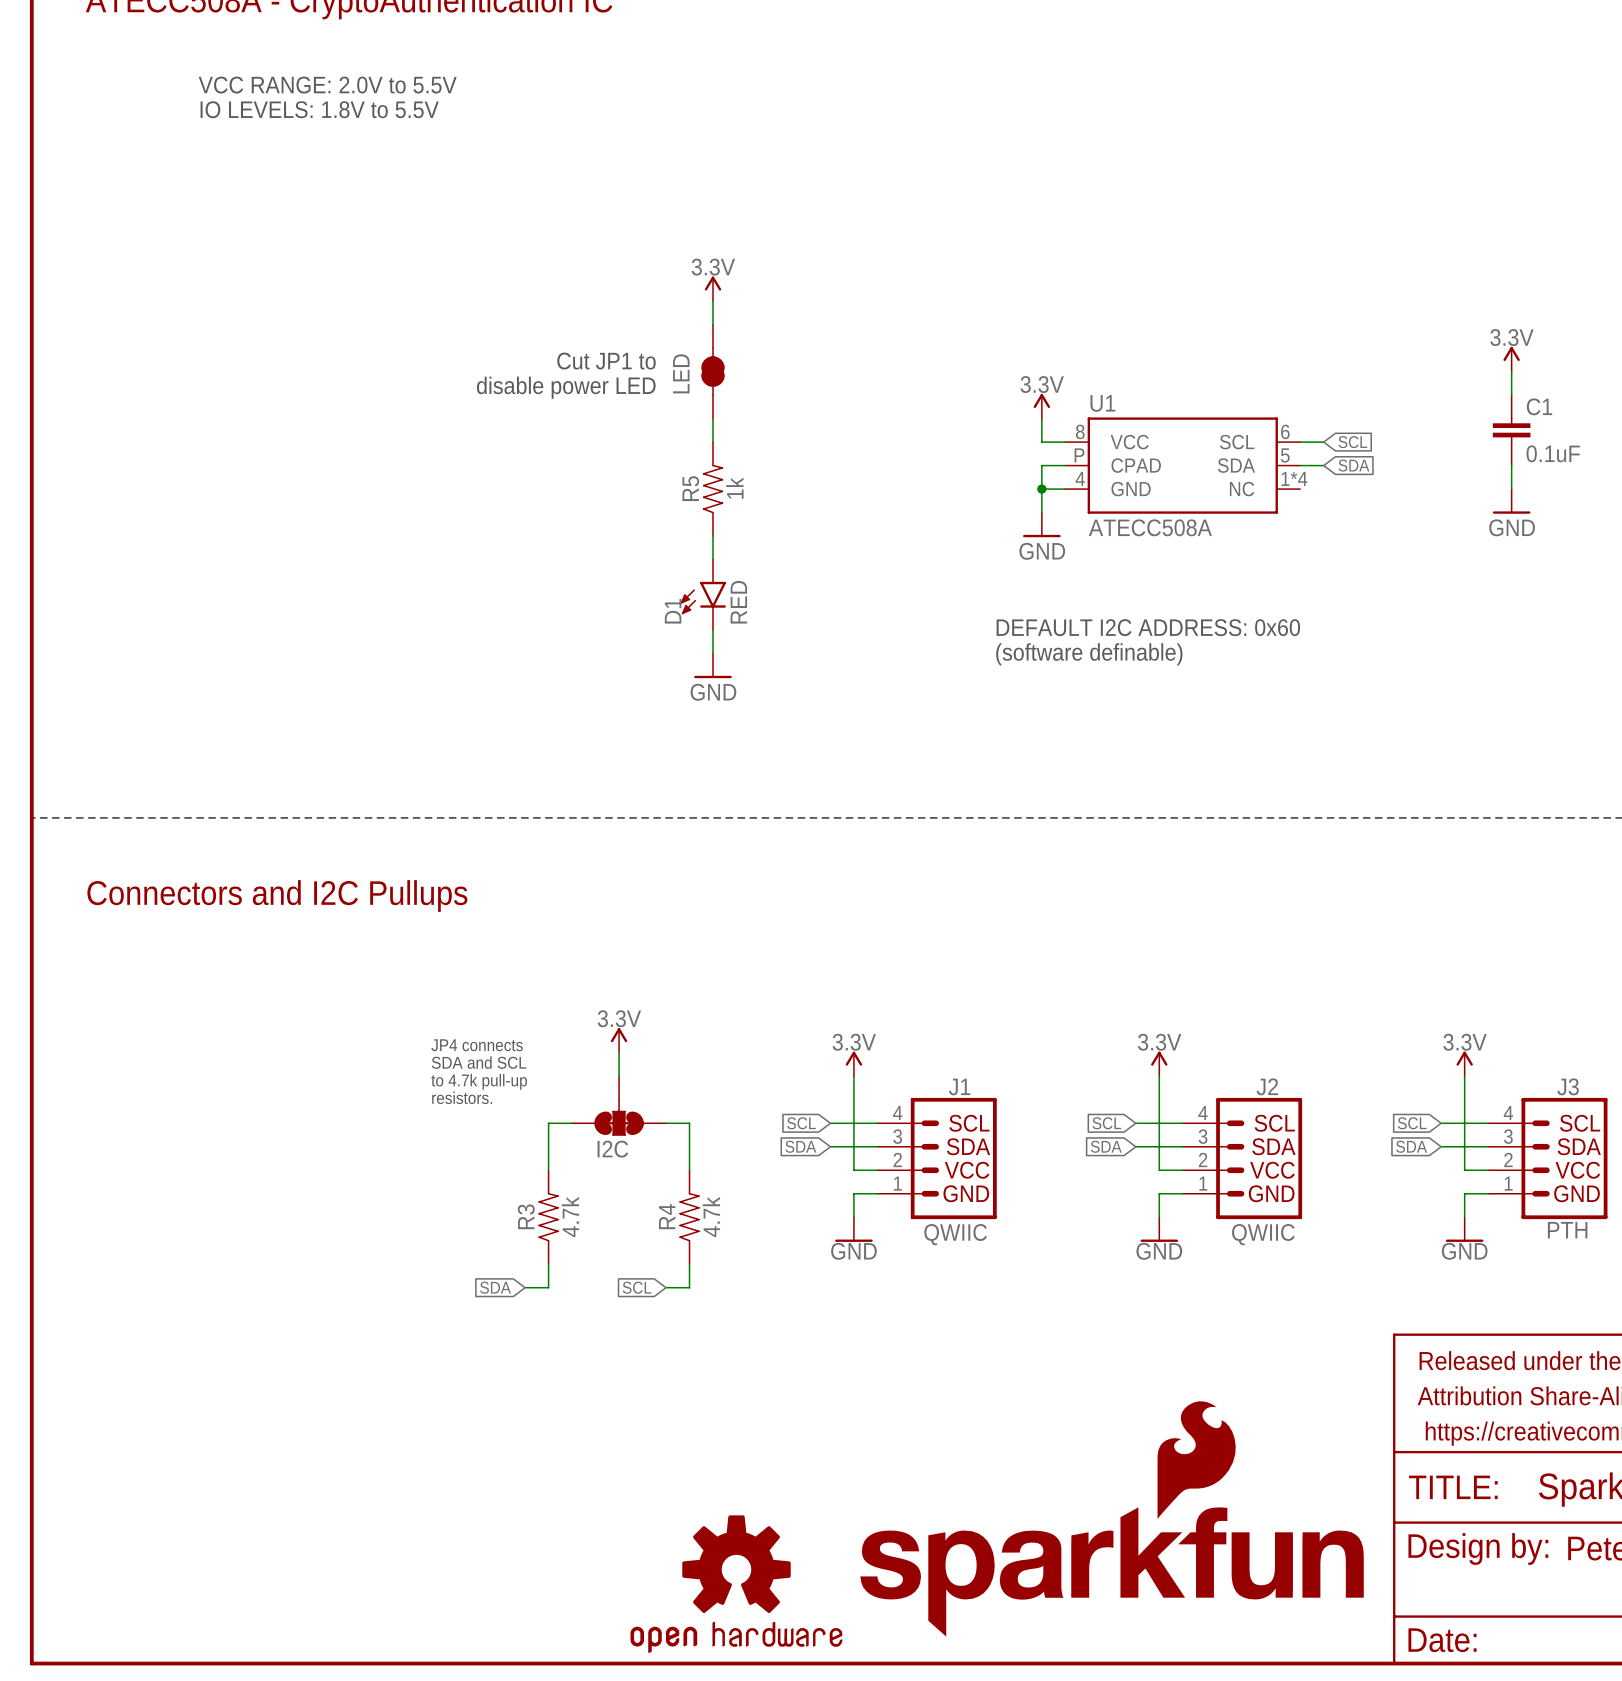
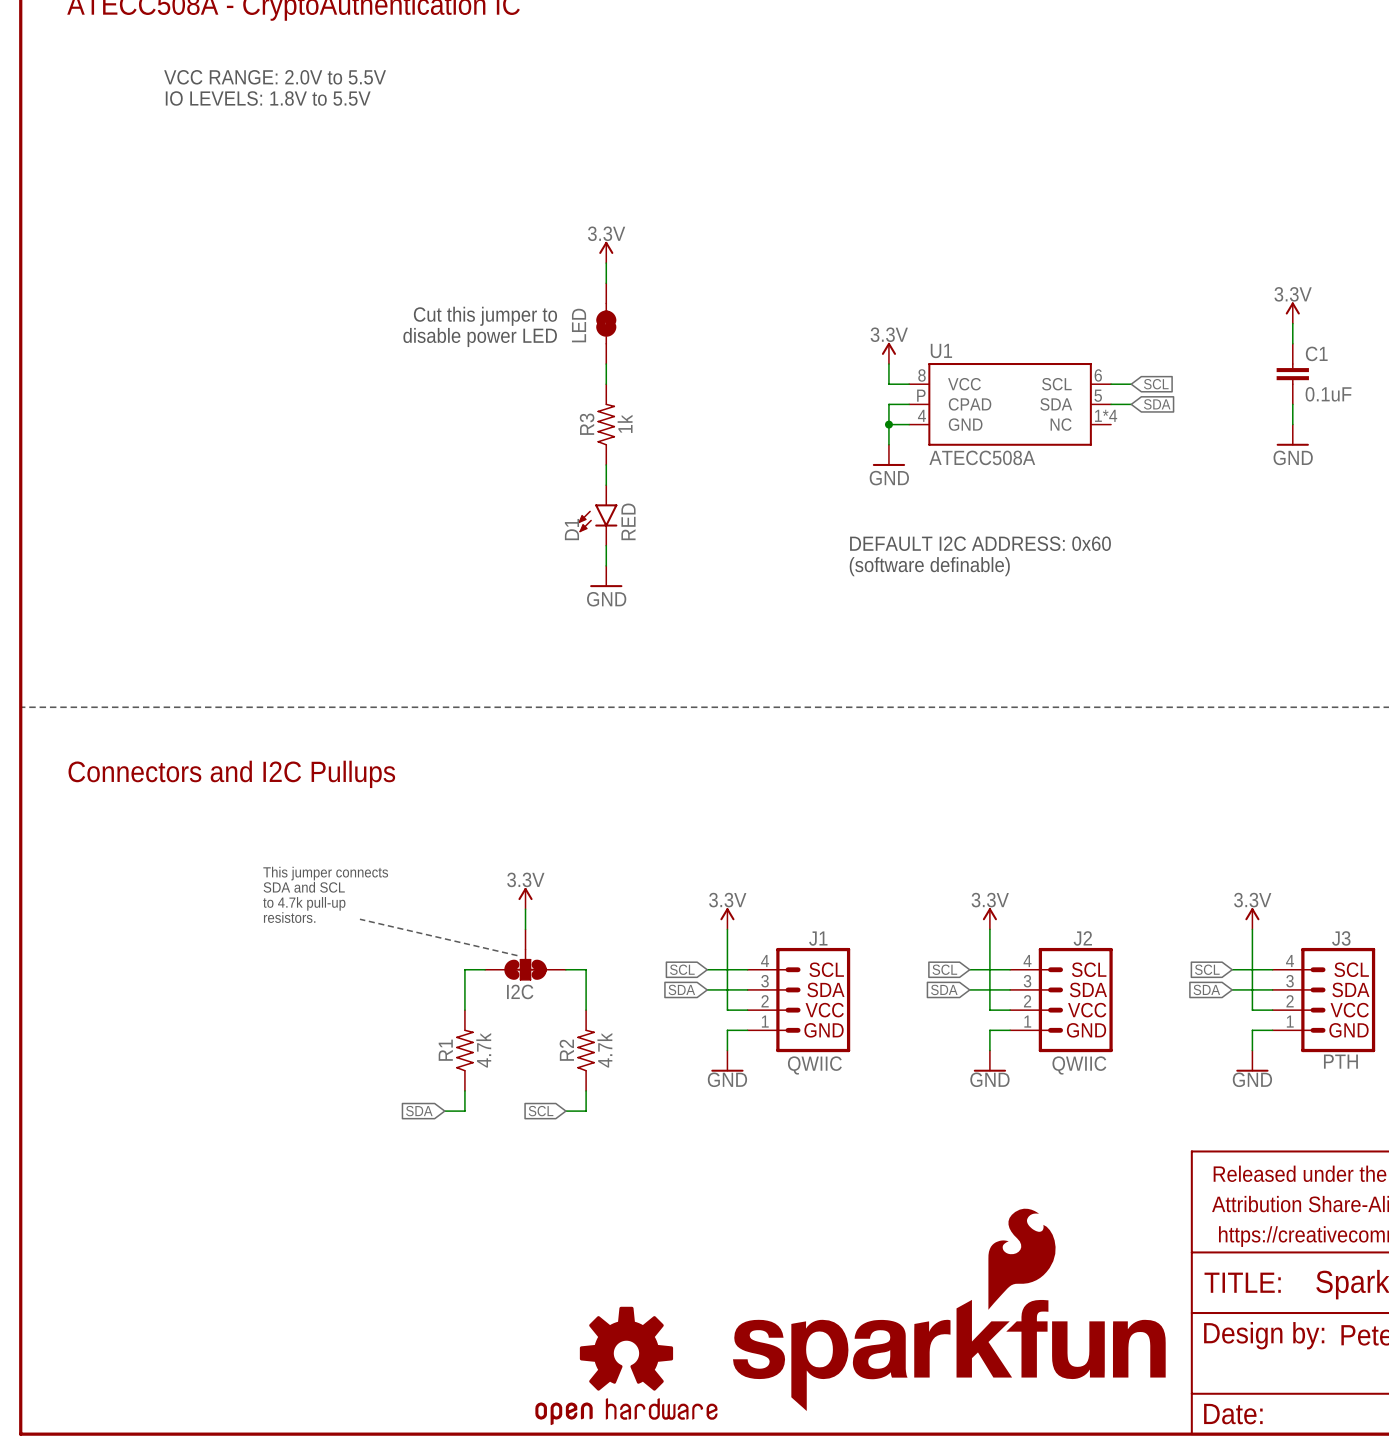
text: Cut JP1 to (606, 361) -> Cut this jumper to (485, 316)
R5 name: R5 (690, 488) -> R3 (587, 424)
text: none -> This jumper connects (325, 873)
text: JP4 connects (477, 1045) -> none
text position: SDA and SCL (479, 1062) -> SDA and SCL (304, 887)
line: none -> (359, 919) (517, 955)
text position: to 4.7k pull-up (479, 1081) -> to 4.7k pull-up (304, 903)
text position: resistors. (462, 1097) -> resistors. (289, 917)
R3 name: R3 (526, 1216) -> R1 (445, 1050)
R4 name: R4 (667, 1216) -> R2 (566, 1050)

